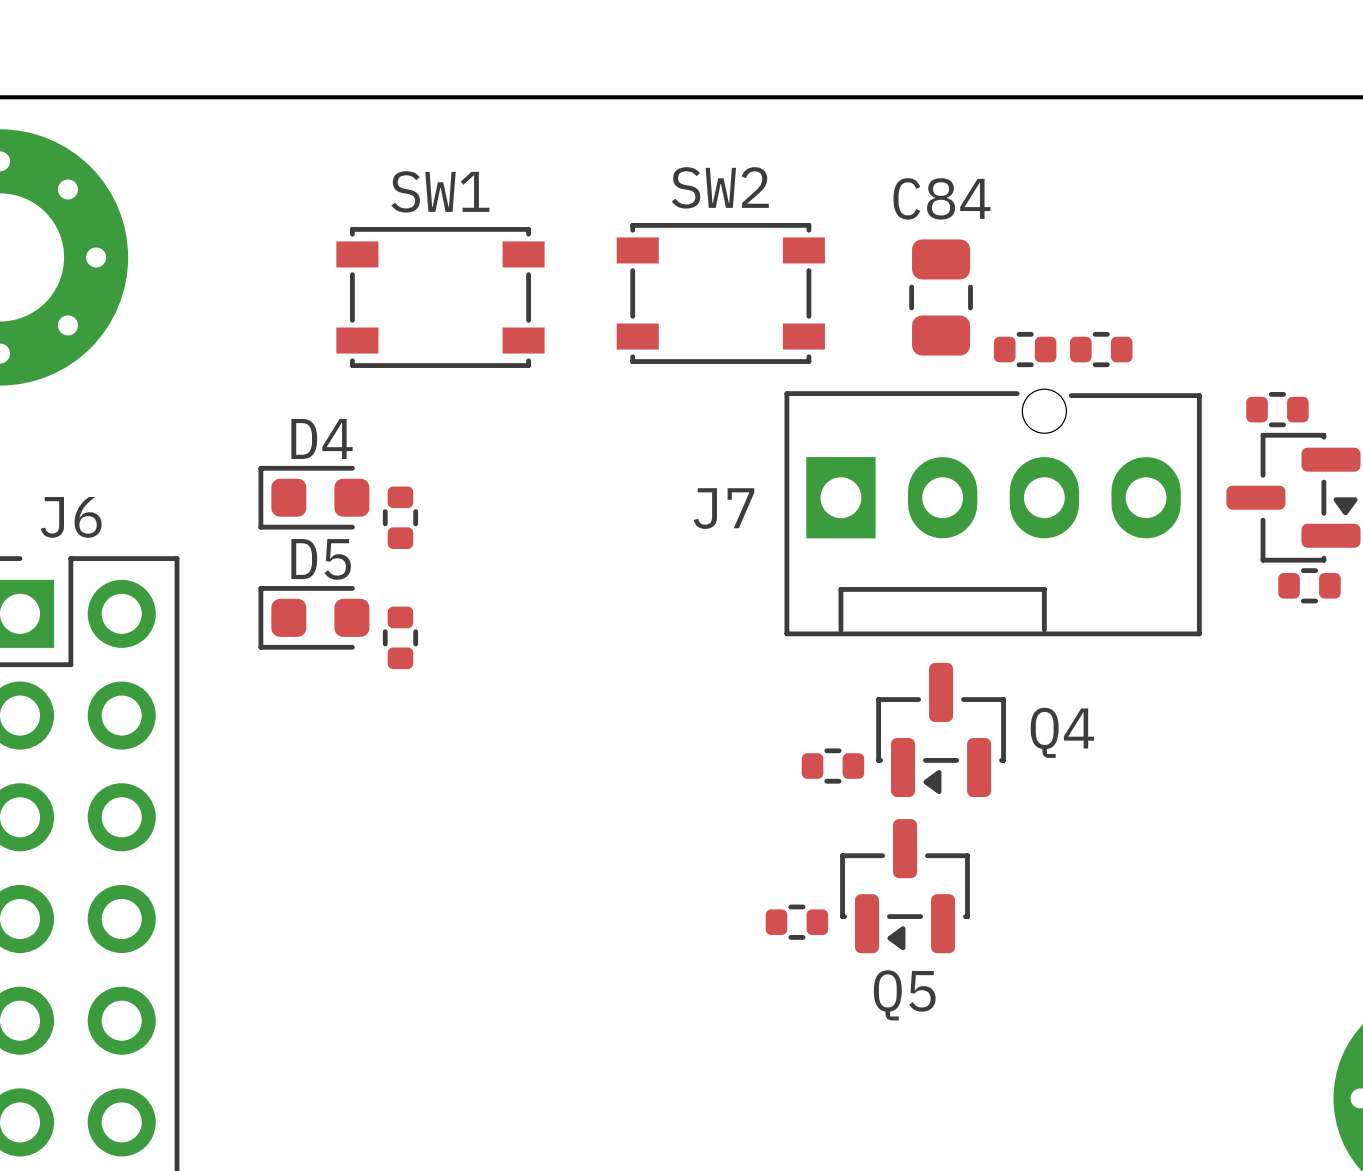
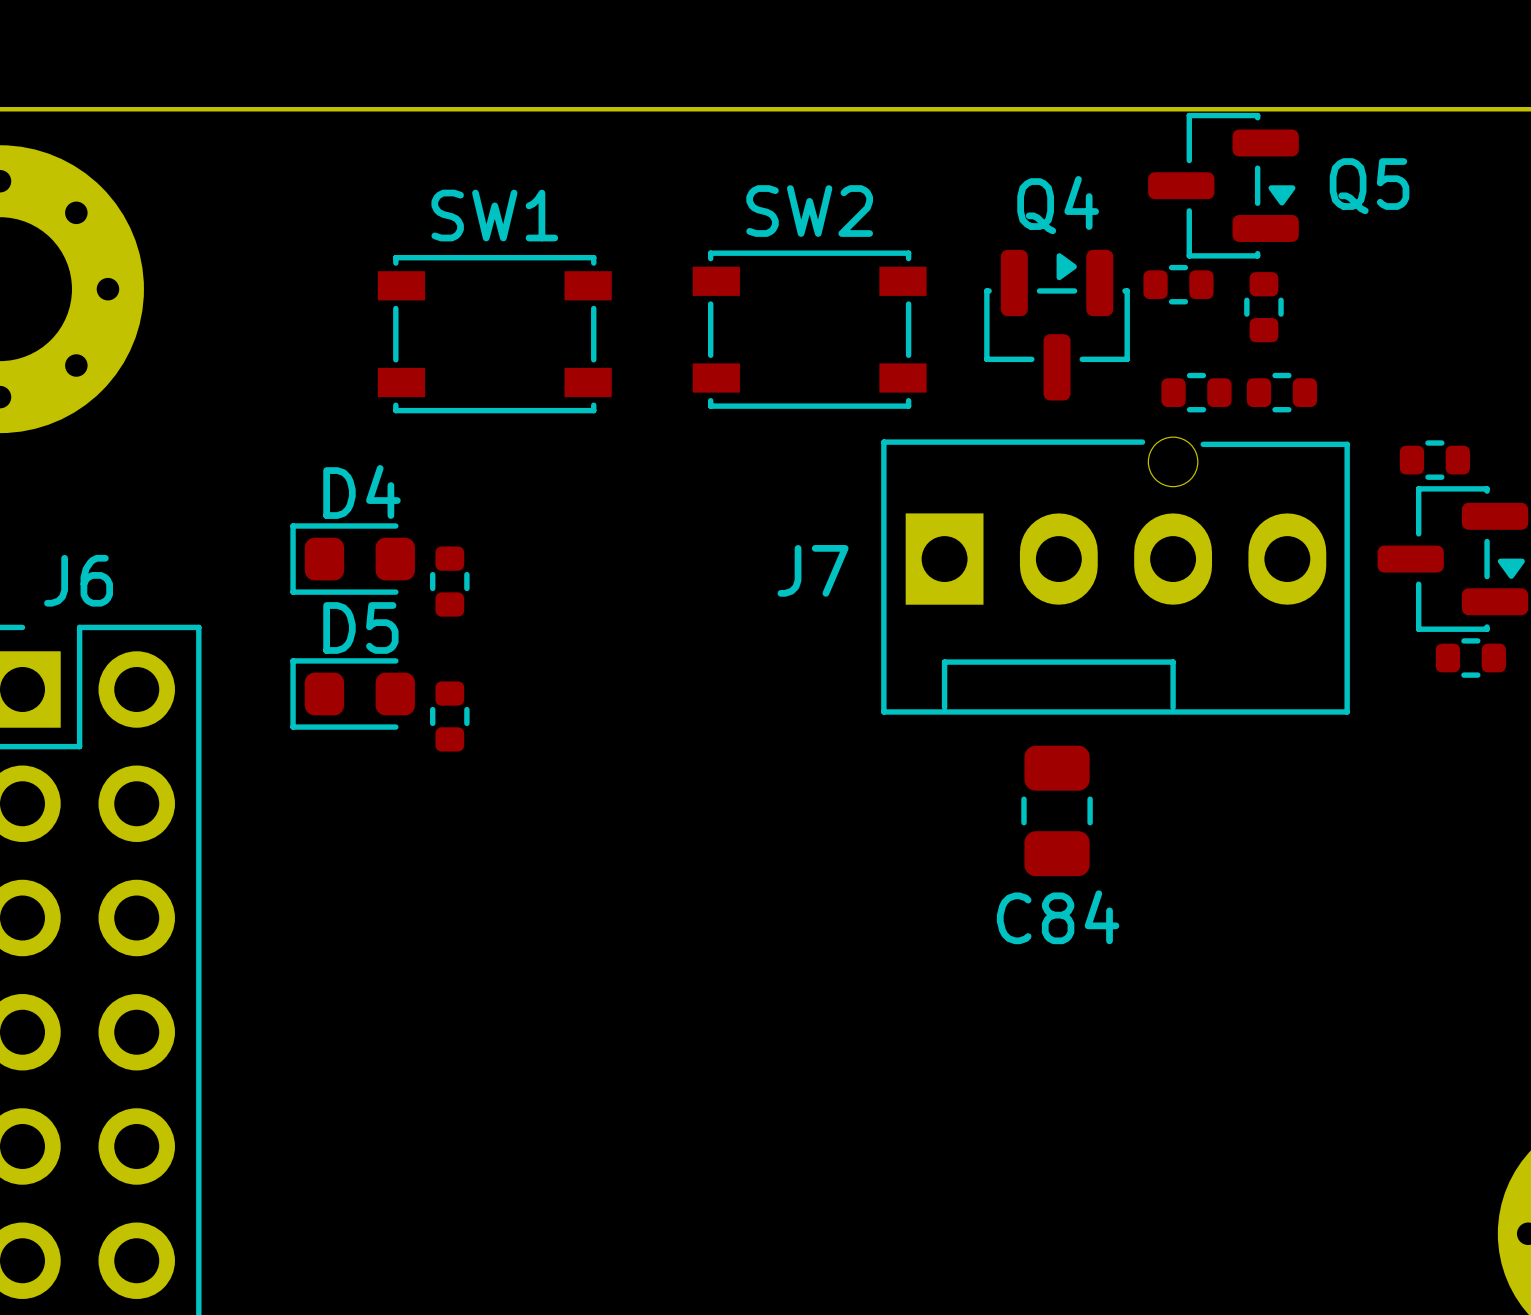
C84 name position: C84 (941, 198) -> C84 (1058, 917)
part: none -> (1178, 284)
part: none -> (1263, 307)
C84 position: (941, 297) -> (1057, 810)
part: (1025, 349) -> none
part: none -> (1196, 392)
part: (1101, 349) -> none
part: none -> (1281, 392)
Q4 rotation: 0° (941, 729) -> 180° (1057, 325)
Q4 position: (941, 729) -> (1057, 325)
Q4 name position: Q4 (1062, 732) -> Q4 (1058, 205)
part: (832, 766) -> none
Q5 rotation: 0° (905, 886) -> 90° counterclockwise (1223, 185)
Q5 position: (905, 886) -> (1223, 185)
part: (796, 922) -> none

